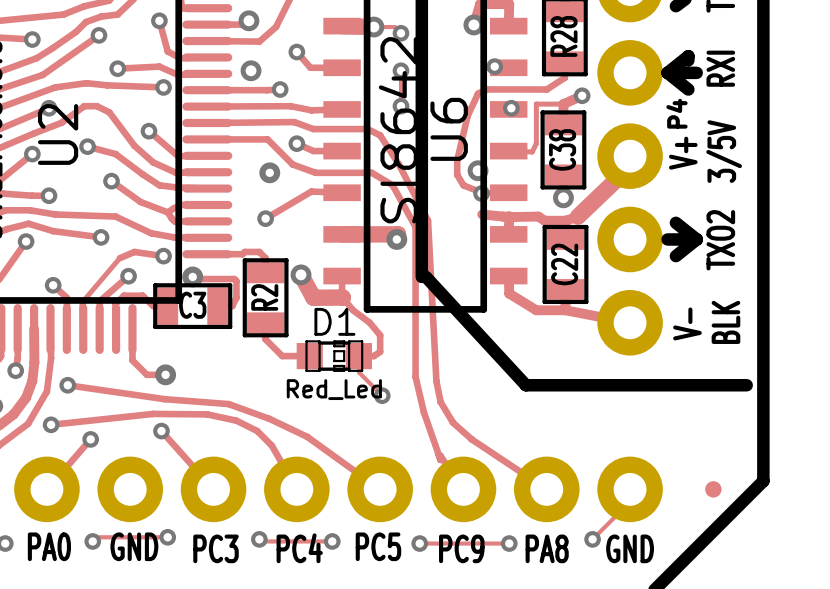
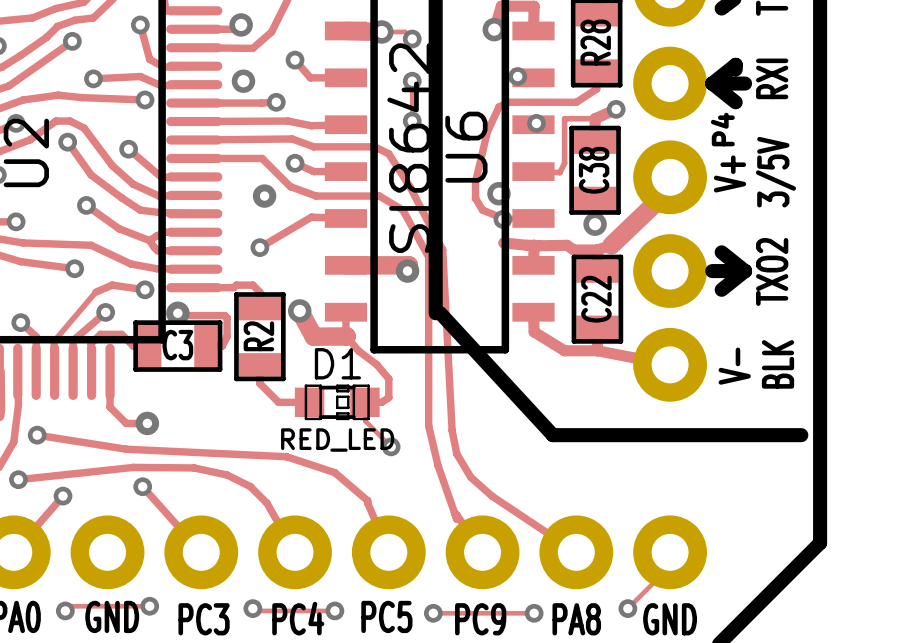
track: (87, 146) (115, 154) -> (67, 142) (91, 174)
via position: (87, 146) -> (67, 142)
track: (67, 385) (164, 399) (228, 404) (269, 418) (307, 436) (380, 489) -> (37, 435) (126, 449) (286, 456) (334, 472) (367, 500) (388, 552)
D1 value: Red_Led (334, 389) -> RED_LED (337, 440)
part: (713, 489) -> none

